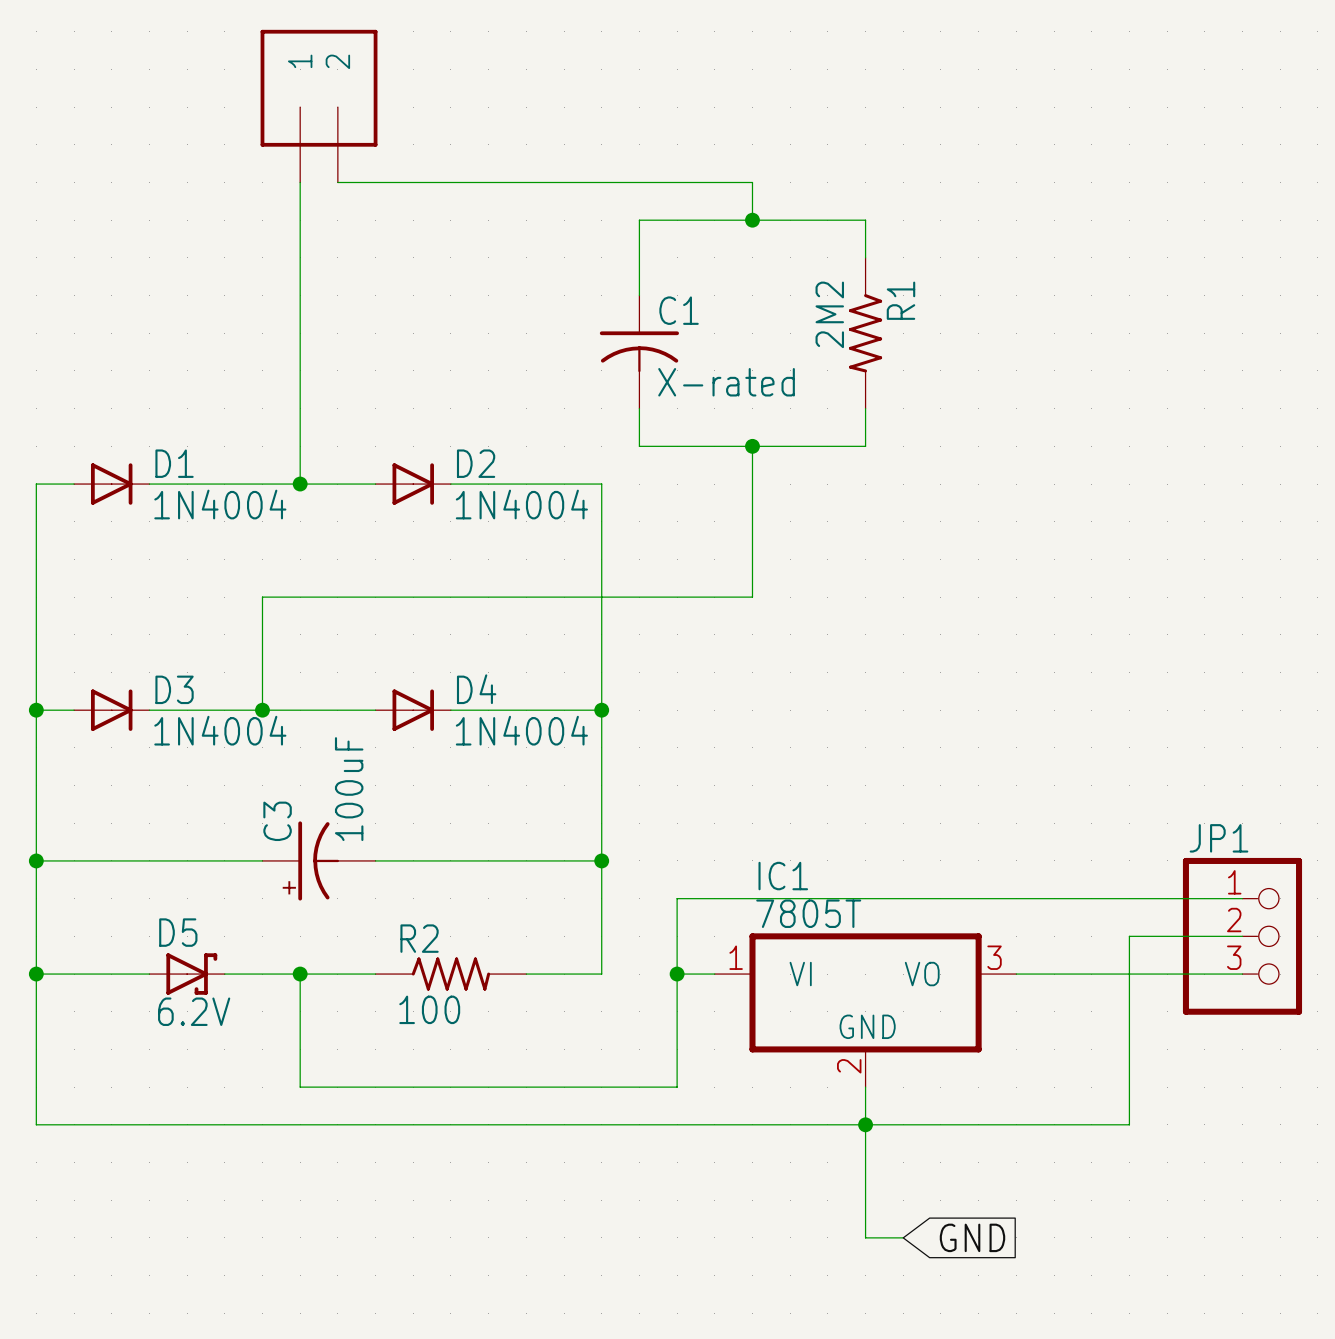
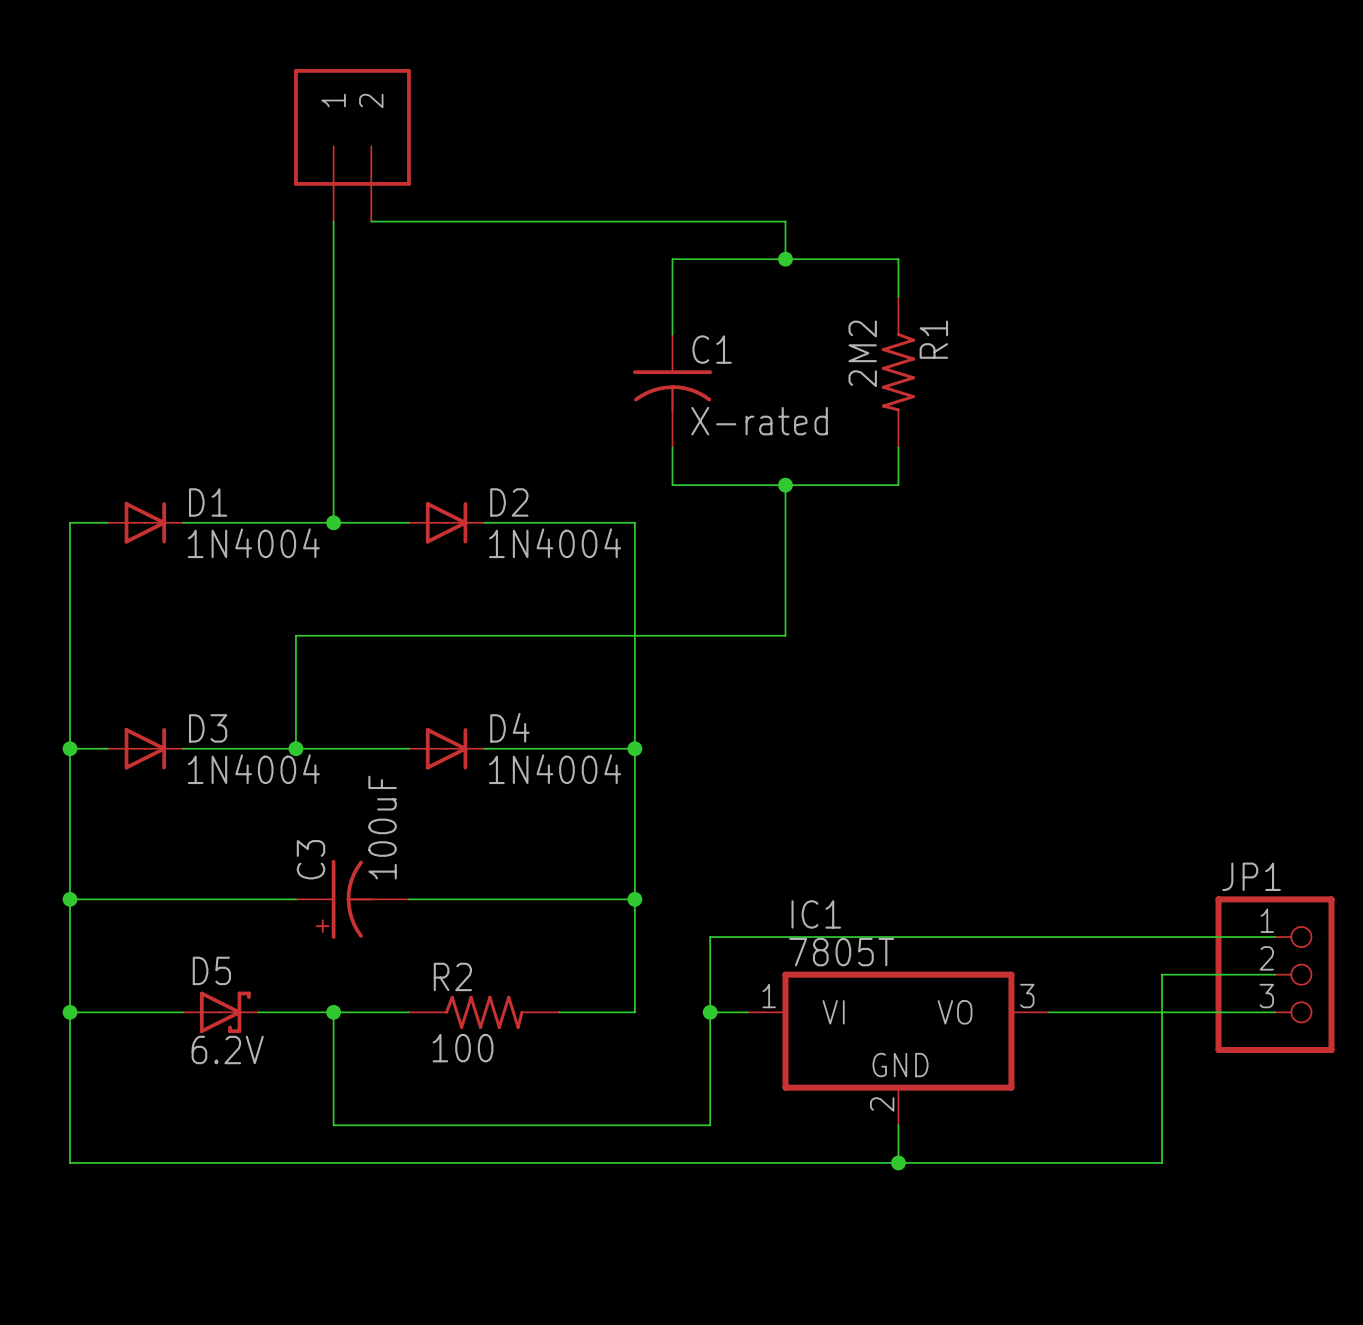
wire: (865, 1124) (865, 1237) (903, 1237) -> none
global label: GND (972, 1237) -> none

